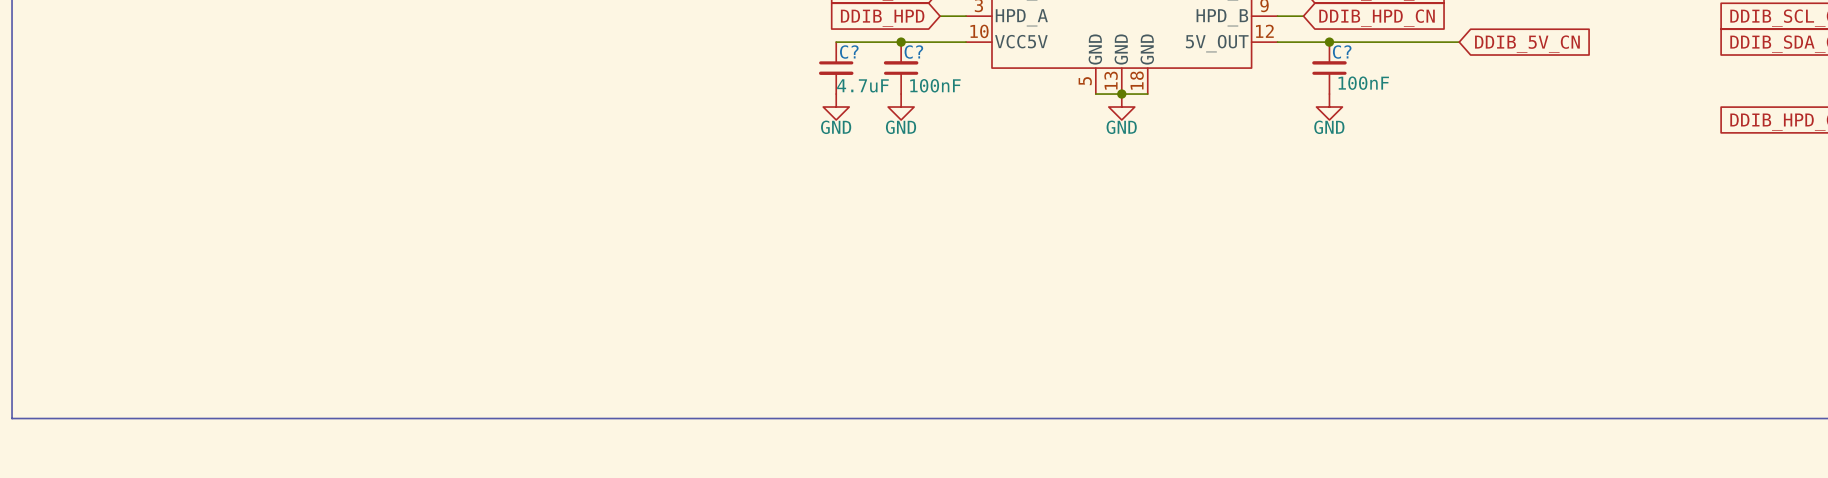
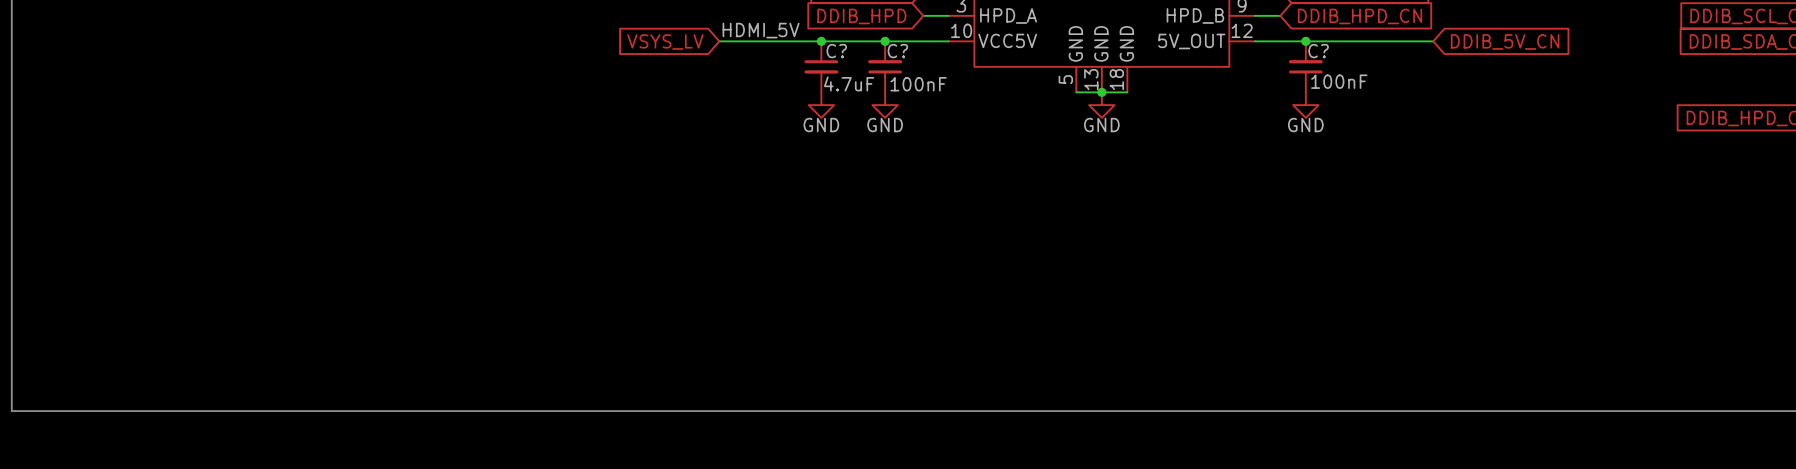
label: none -> HDMI_5V (761, 30)
wire: none -> (719, 41) (821, 41)
junction: none -> (821, 41)
global label: none -> VSYS_LV (665, 41)

